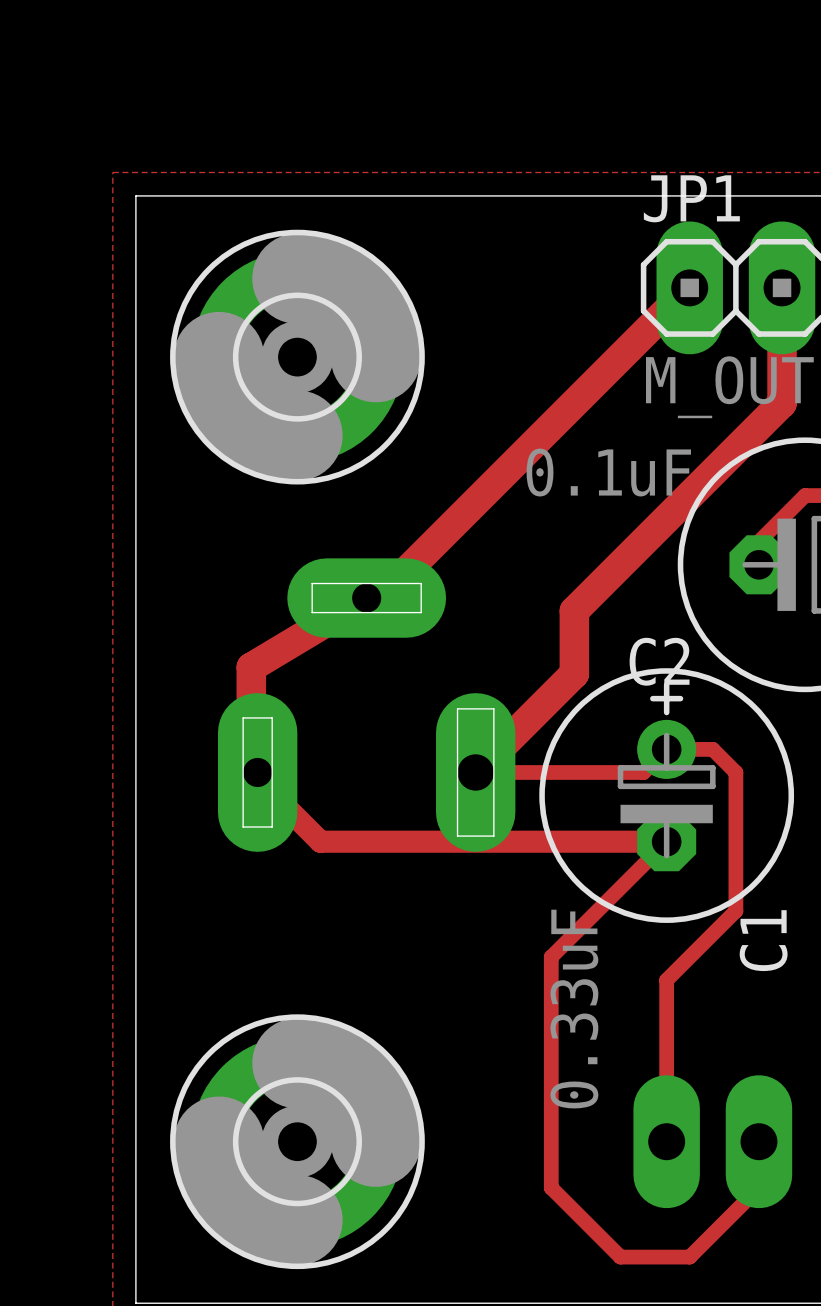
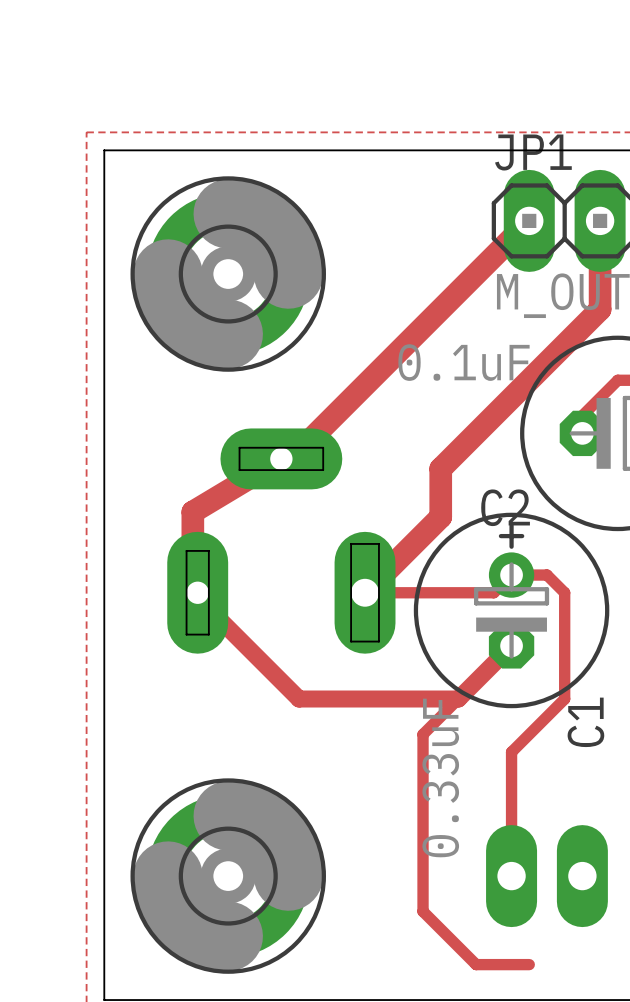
track: (320, 841) (666, 841) -> (245, 645) (299, 699) (458, 699) (511, 645)
track: (758, 1187) (689, 1257) -> none

